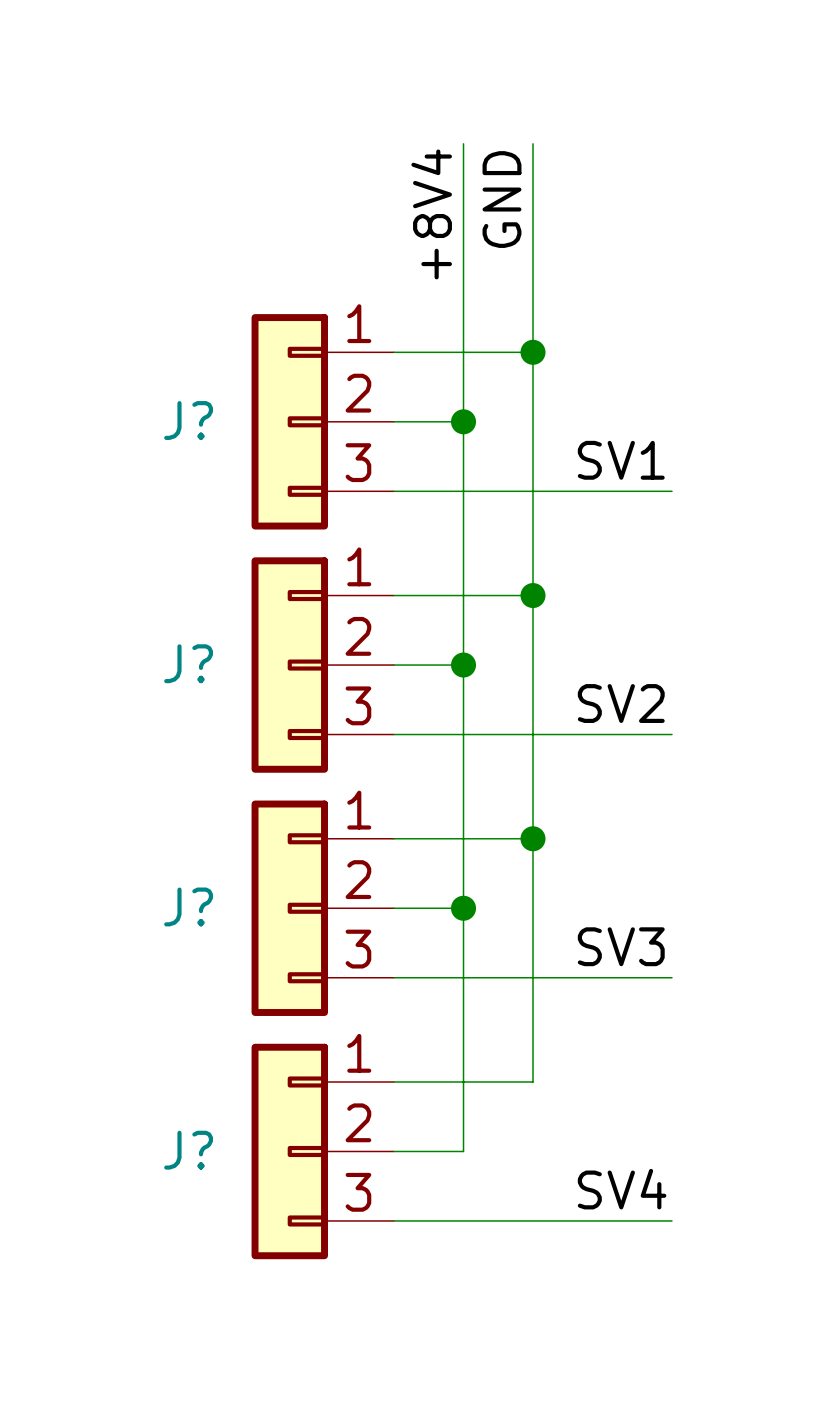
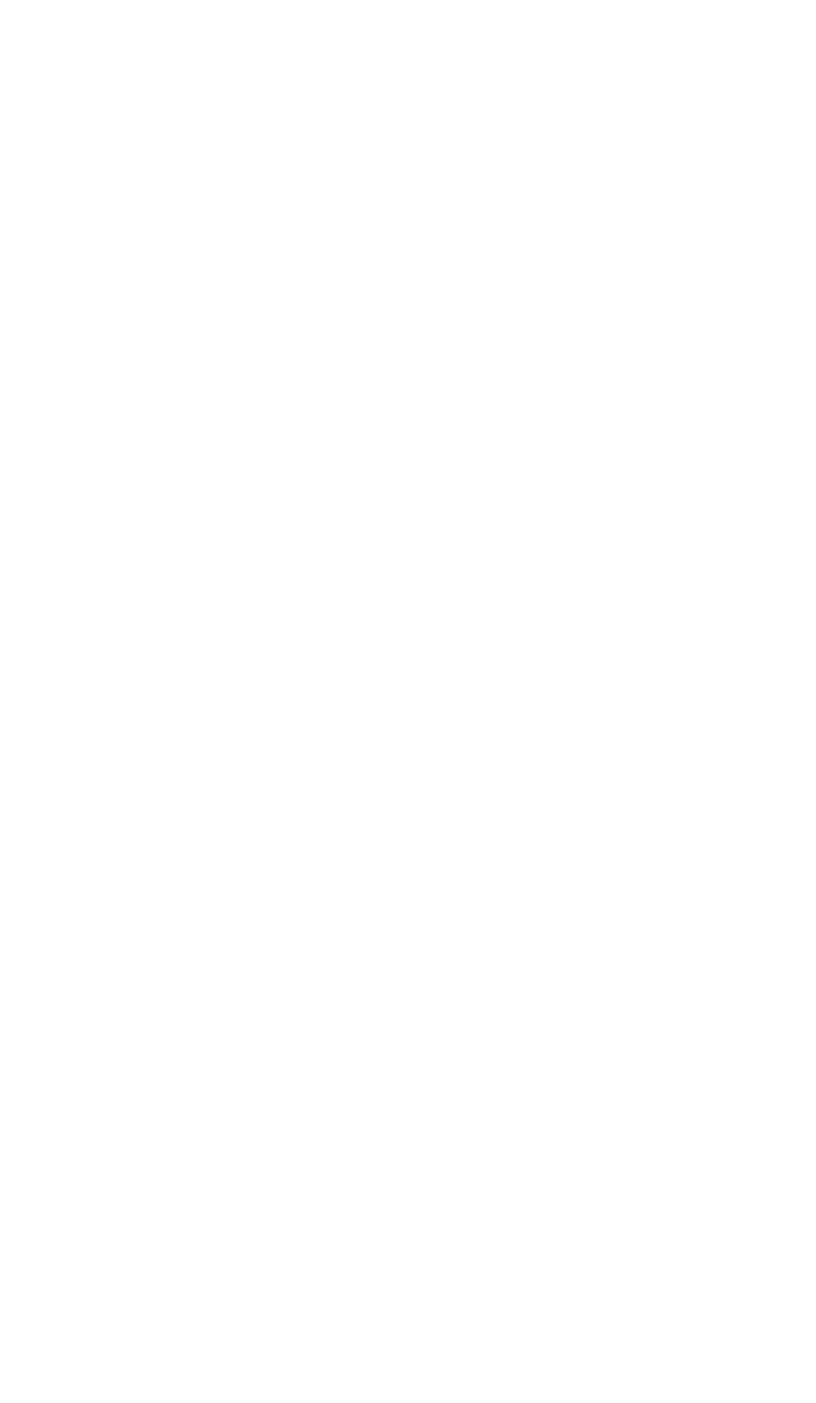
wire: (463, 143) (463, 1151) (394, 1151) -> none
wire: (533, 143) (533, 1081) (394, 1081) -> none
label: GND (501, 199) -> none
label: +8V4 (431, 214) -> none
wire: (394, 352) (533, 352) -> none
junction: (533, 352) -> none
J?: (322, 421) -> none
wire: (394, 421) (463, 421) -> none
junction: (463, 421) -> none
label: SV1 (621, 460) -> none
wire: (394, 491) (671, 491) -> none
wire: (394, 595) (533, 595) -> none
junction: (533, 595) -> none
J?: (322, 665) -> none
wire: (394, 665) (463, 665) -> none
junction: (463, 665) -> none
label: SV2 (621, 703) -> none
wire: (394, 734) (671, 734) -> none
wire: (394, 838) (533, 838) -> none
junction: (533, 838) -> none
J?: (322, 908) -> none
wire: (394, 908) (463, 908) -> none
junction: (463, 908) -> none
label: SV3 (621, 946) -> none
wire: (394, 977) (671, 977) -> none
J?: (322, 1151) -> none
label: SV4 (622, 1189) -> none
wire: (394, 1220) (671, 1220) -> none

